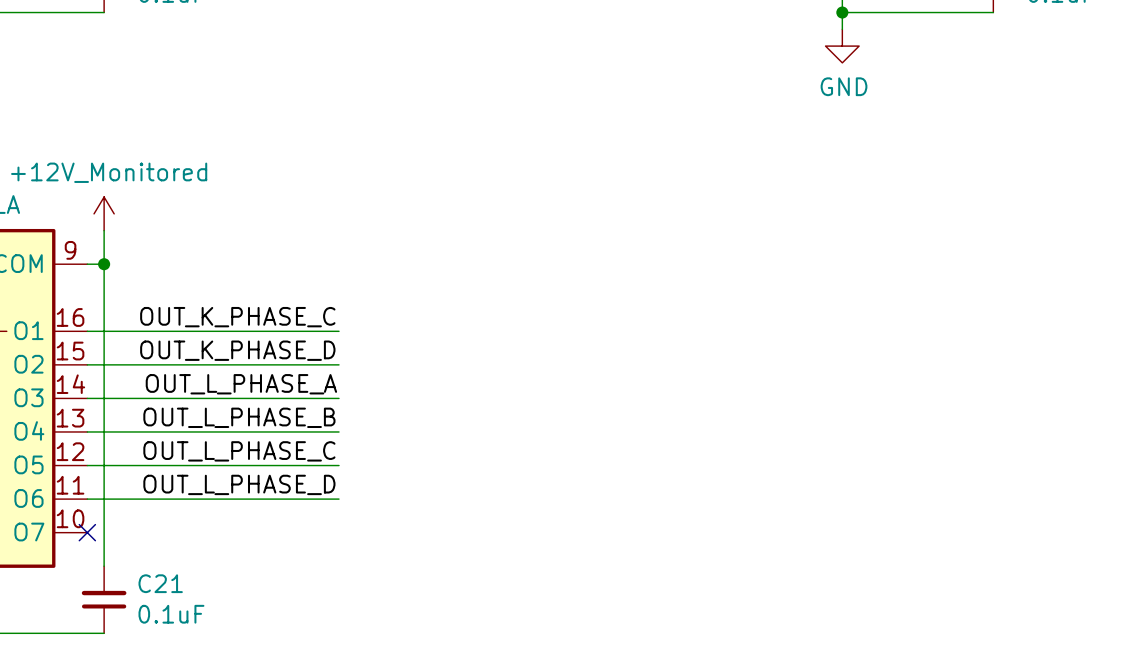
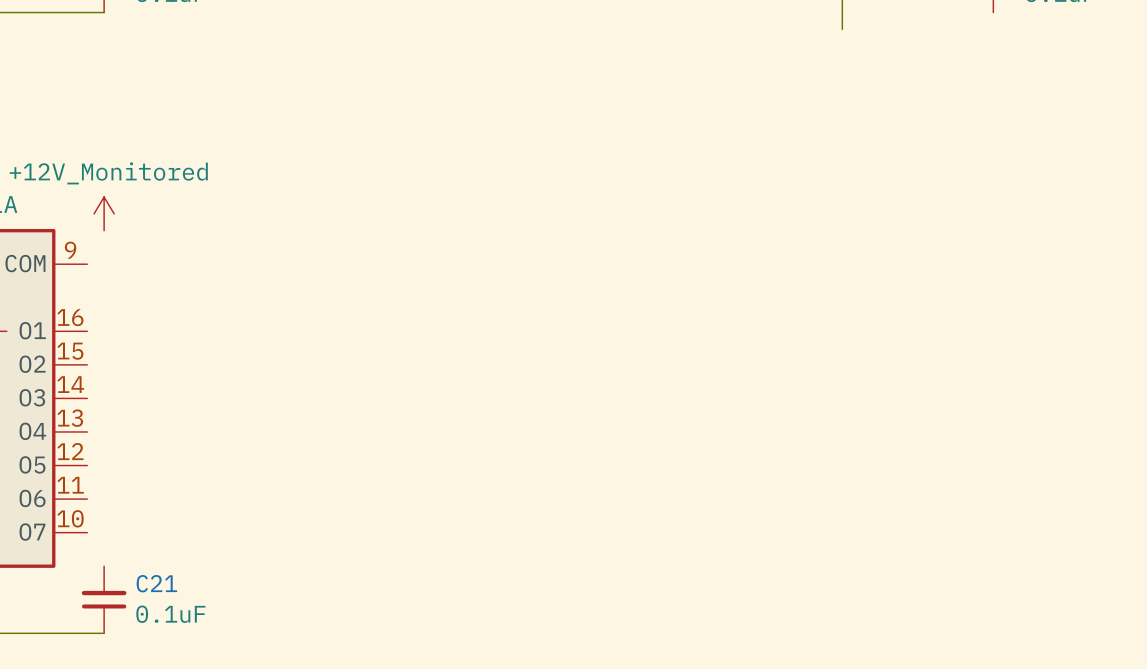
wire: (842, 12) (993, 12) -> none
junction: (842, 12) -> none
power symbol: GND (842, 46) -> none
wire: (104, 230) (104, 566) -> none
wire: (87, 264) (104, 264) -> none
junction: (104, 264) -> none
label: OUT_K_PHASE_C (237, 317) -> none
wire: (87, 331) (339, 331) -> none
label: OUT_K_PHASE_D (237, 350) -> none
wire: (87, 364) (339, 364) -> none
label: OUT_L_PHASE_A (241, 384) -> none
wire: (87, 398) (339, 398) -> none
label: OUT_L_PHASE_B (239, 417) -> none
wire: (87, 431) (339, 431) -> none
label: OUT_L_PHASE_C (239, 451) -> none
wire: (87, 465) (339, 465) -> none
label: OUT_L_PHASE_D (239, 484) -> none
wire: (87, 499) (339, 499) -> none
no-connect mark: (87, 532) -> none

